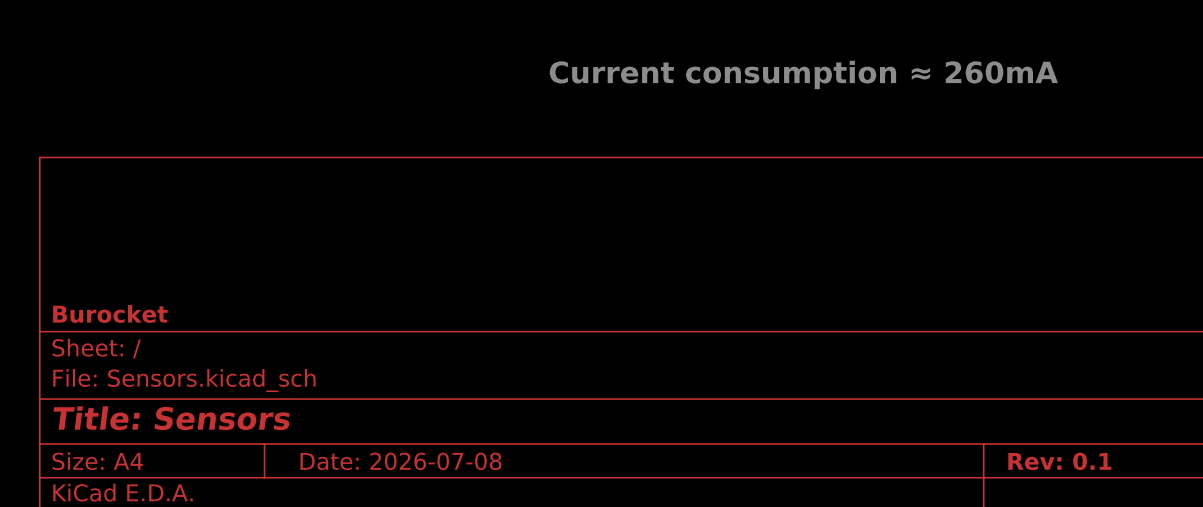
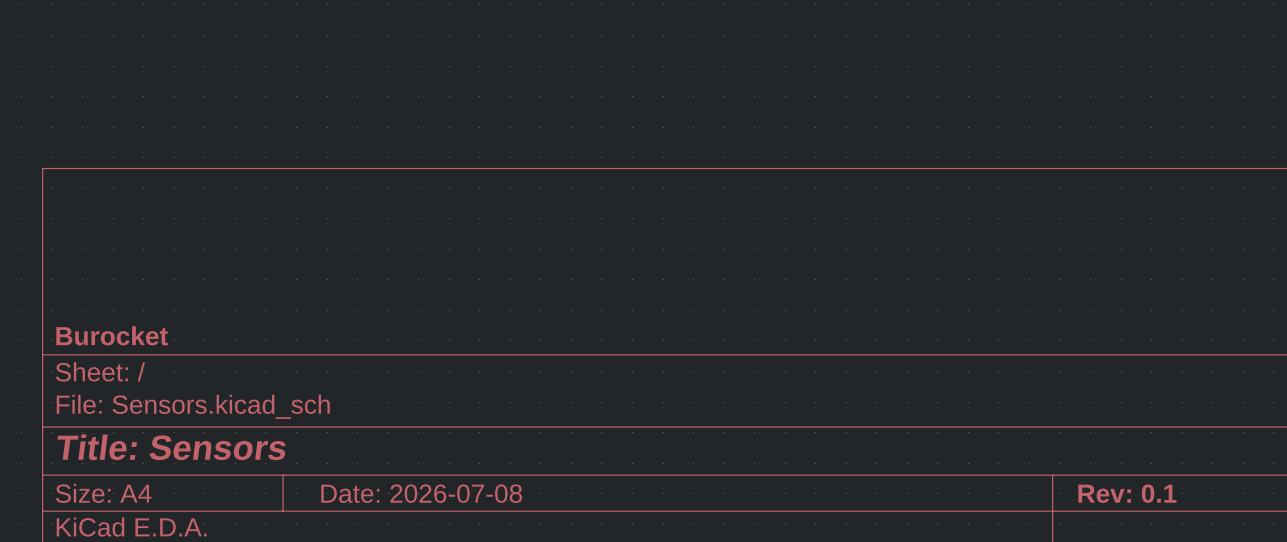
text: Current consumption ≈ 260mA (803, 74) -> none

